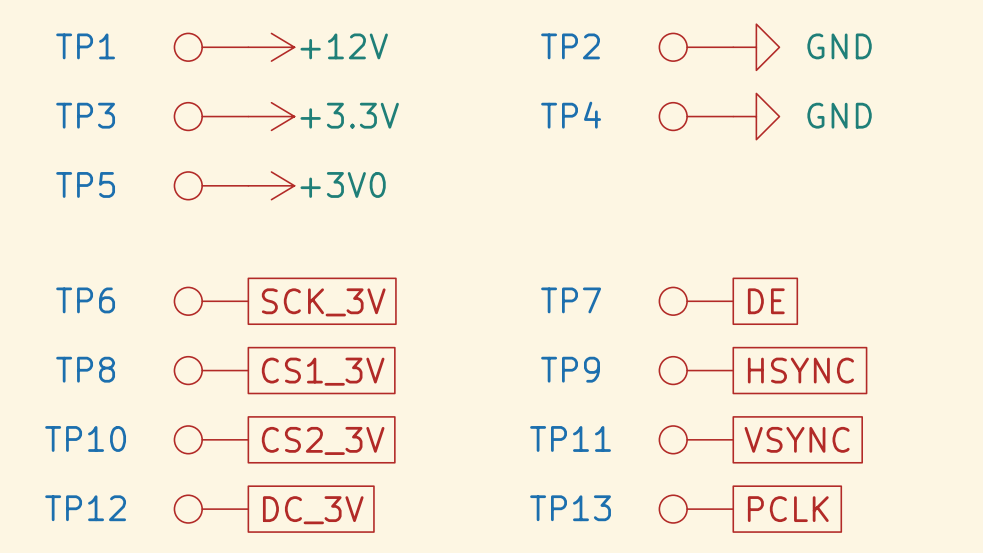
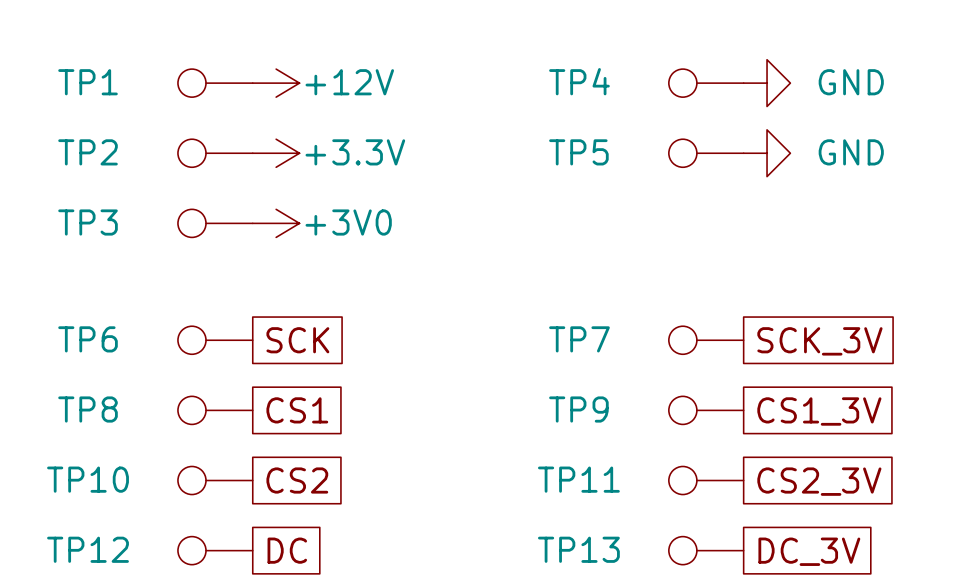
TP2 name: TP2 (570, 46) -> TP4 (579, 81)
TP3 name: TP3 (85, 115) -> TP2 (88, 152)
TP4 name: TP4 (571, 115) -> TP5 (578, 152)
TP5 name: TP5 (85, 184) -> TP3 (88, 222)
global label: DE (766, 301) -> SCK_3V (819, 341)
global label: SCK_3V (323, 302) -> SCK (297, 340)
global label: HSYNC (800, 370) -> CS1_3V (819, 411)
global label: CS1_3V (323, 371) -> CS1 (297, 410)
global label: VSYNC (797, 439) -> CS2_3V (819, 481)
global label: CS2_3V (323, 440) -> CS2 (297, 480)
global label: PCLK (788, 509) -> DC_3V (809, 551)
global label: DC_3V (313, 510) -> DC (287, 550)

